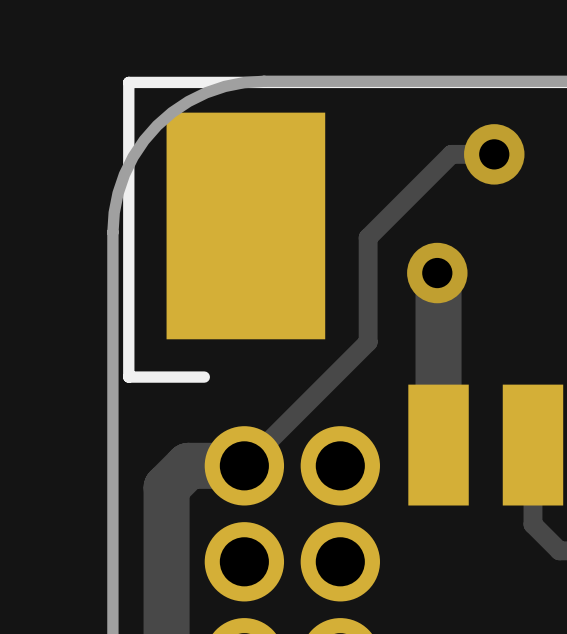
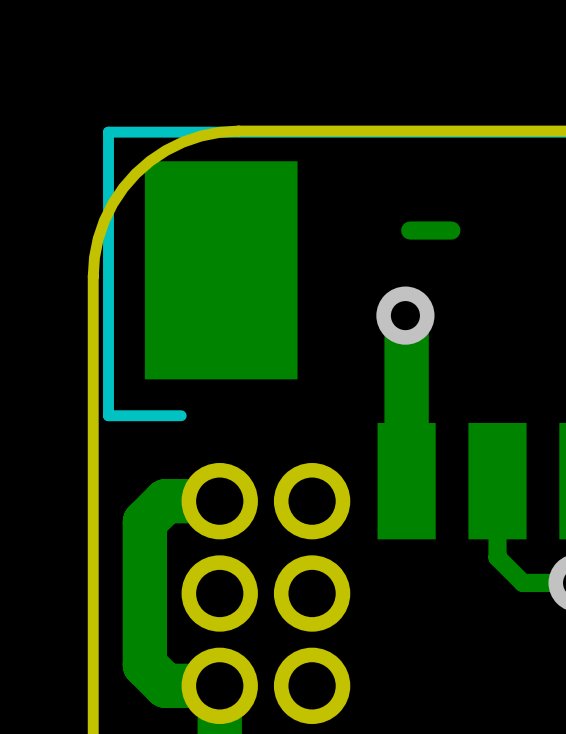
track: (494, 154) (451, 154) (368, 237) (368, 342) (244, 465) -> none
via: (494, 154) -> none
track: none -> (451, 230) (410, 230)

